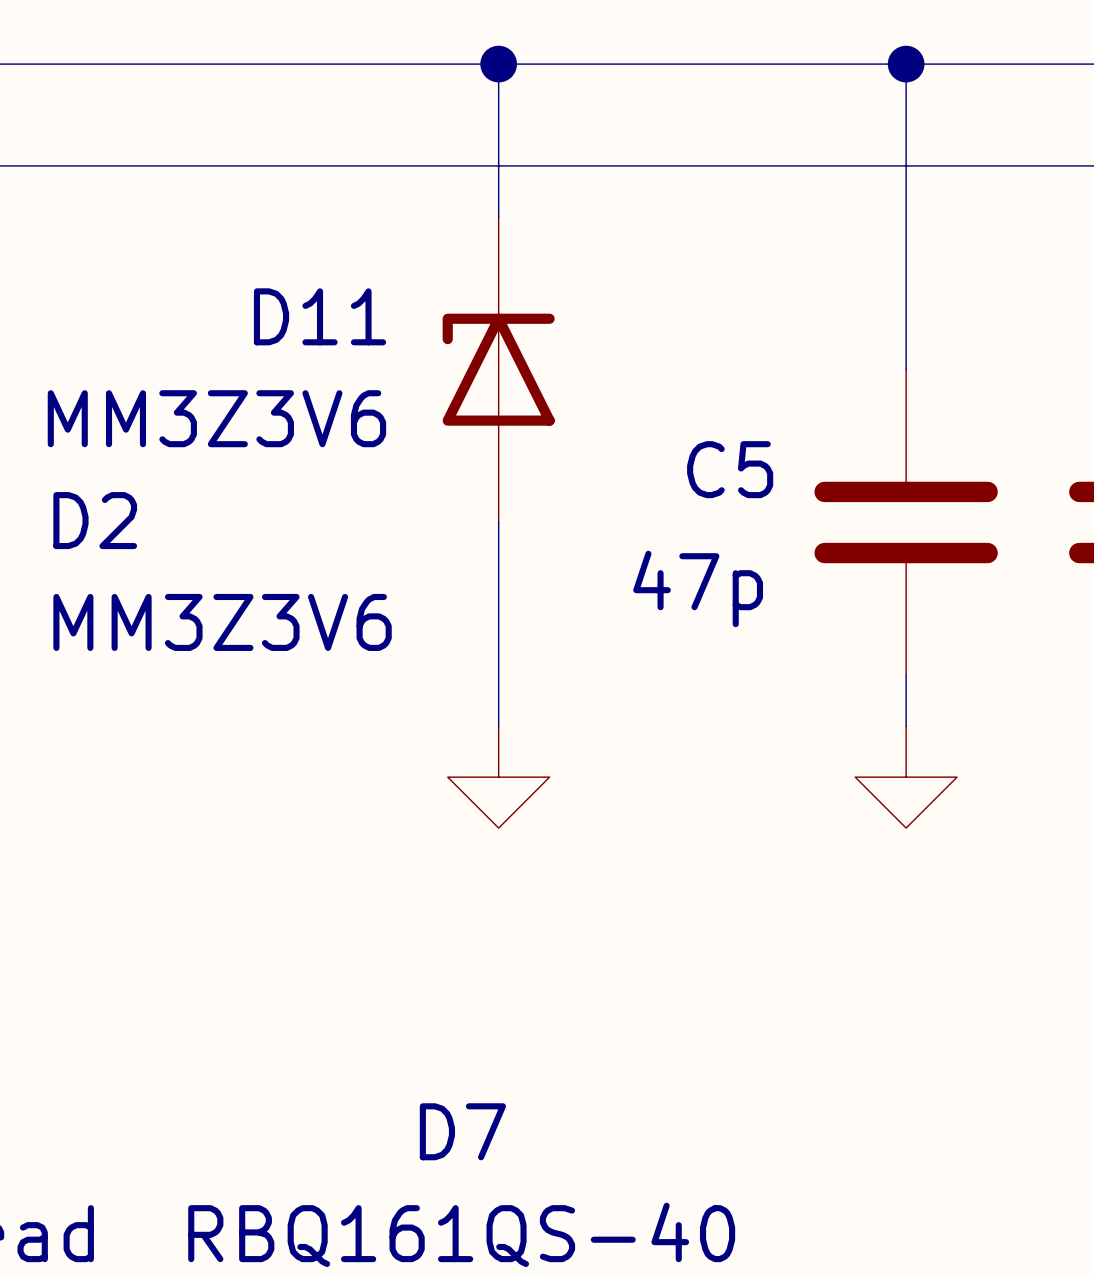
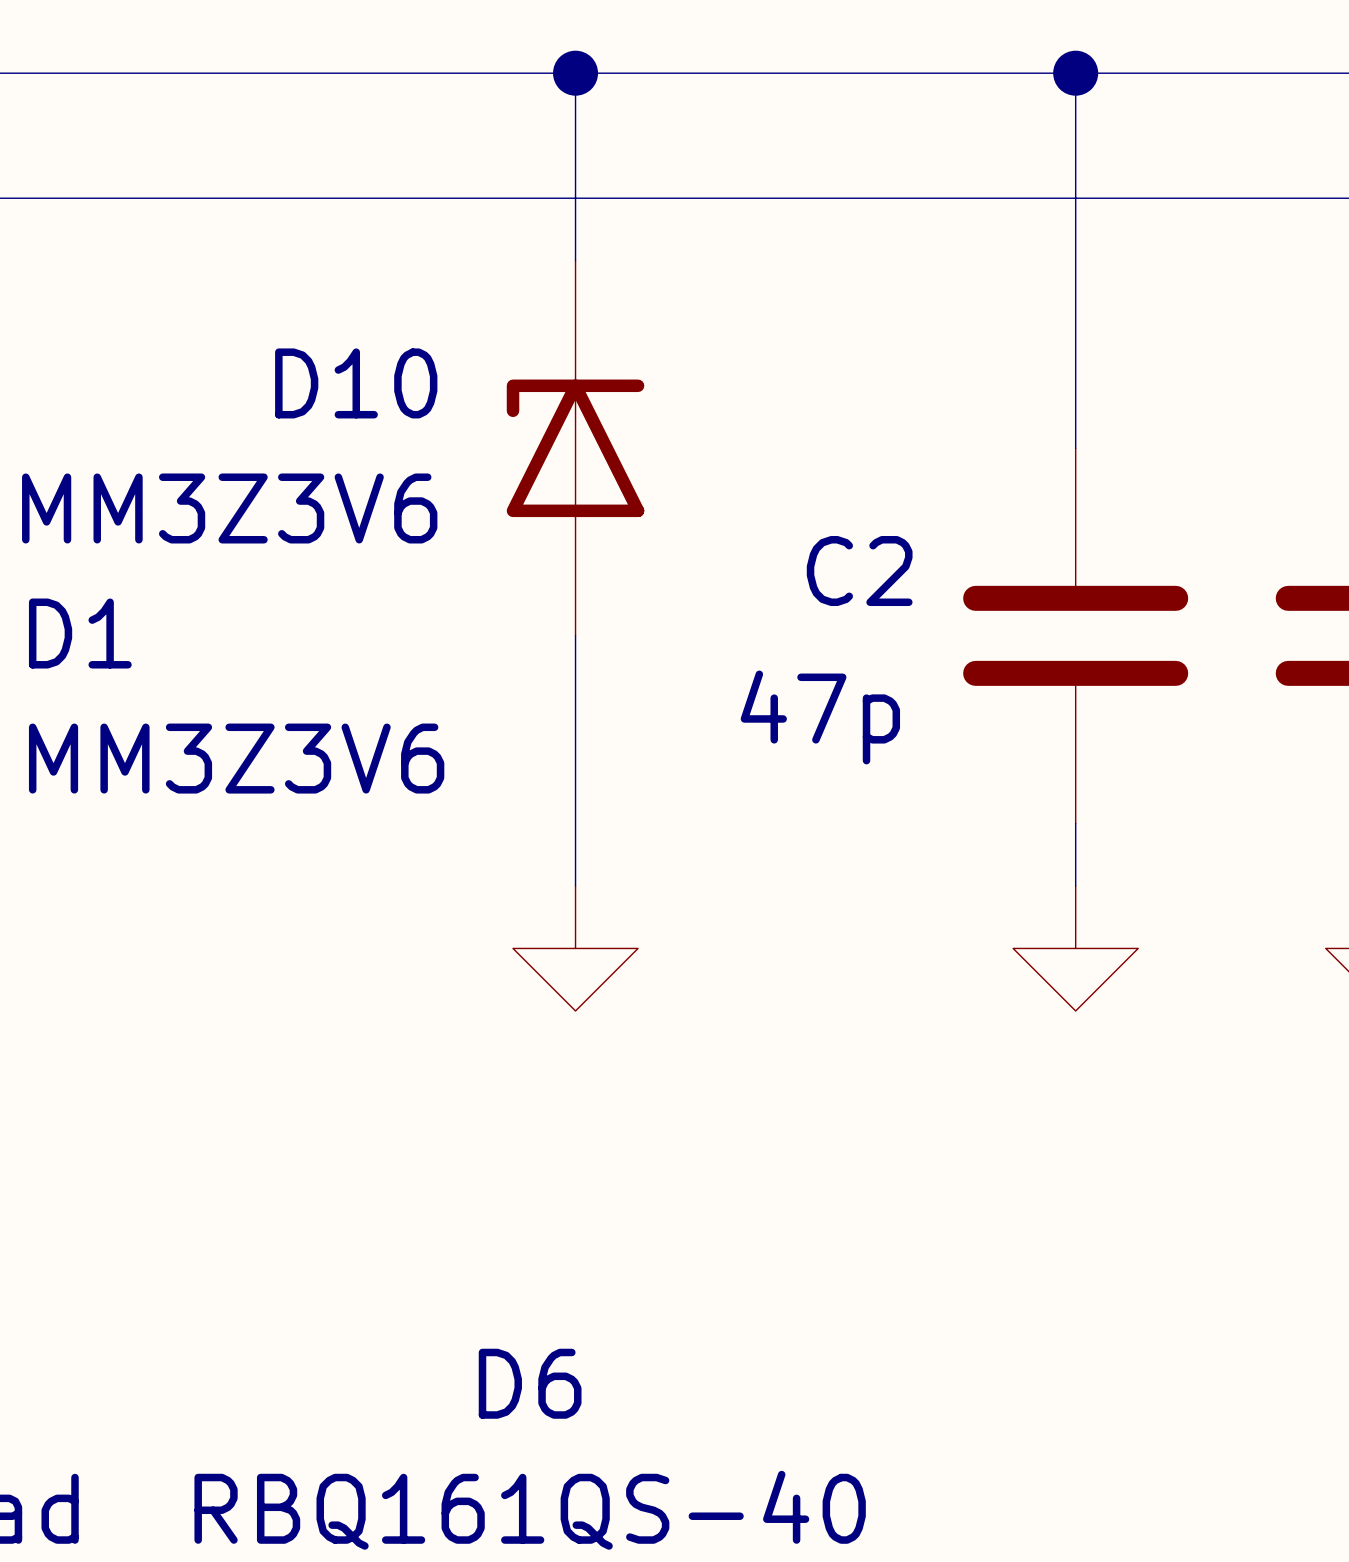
D11 name: D11 (320, 316) -> D10 (356, 383)
C5 name: C5 (730, 469) -> C2 (859, 571)
D2 name: D2 (95, 520) -> D1 (80, 633)
D7 name: D7 (462, 1131) -> D6 (530, 1383)

